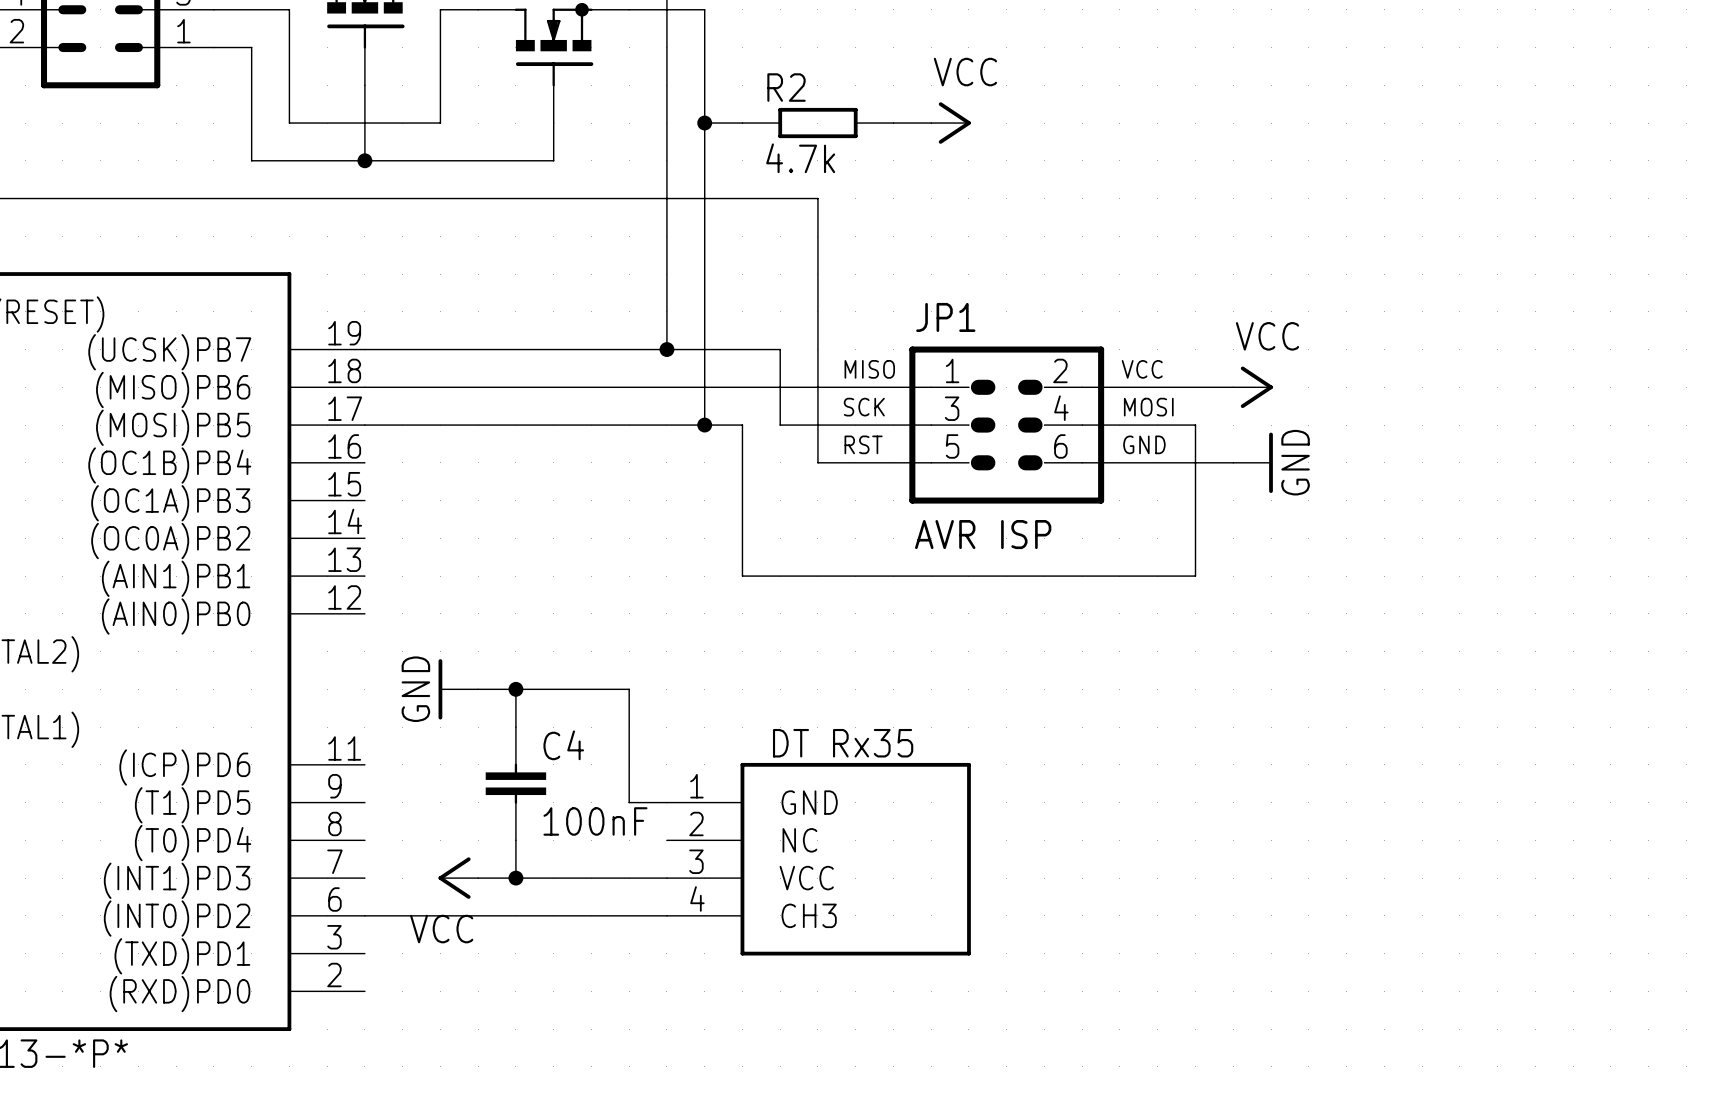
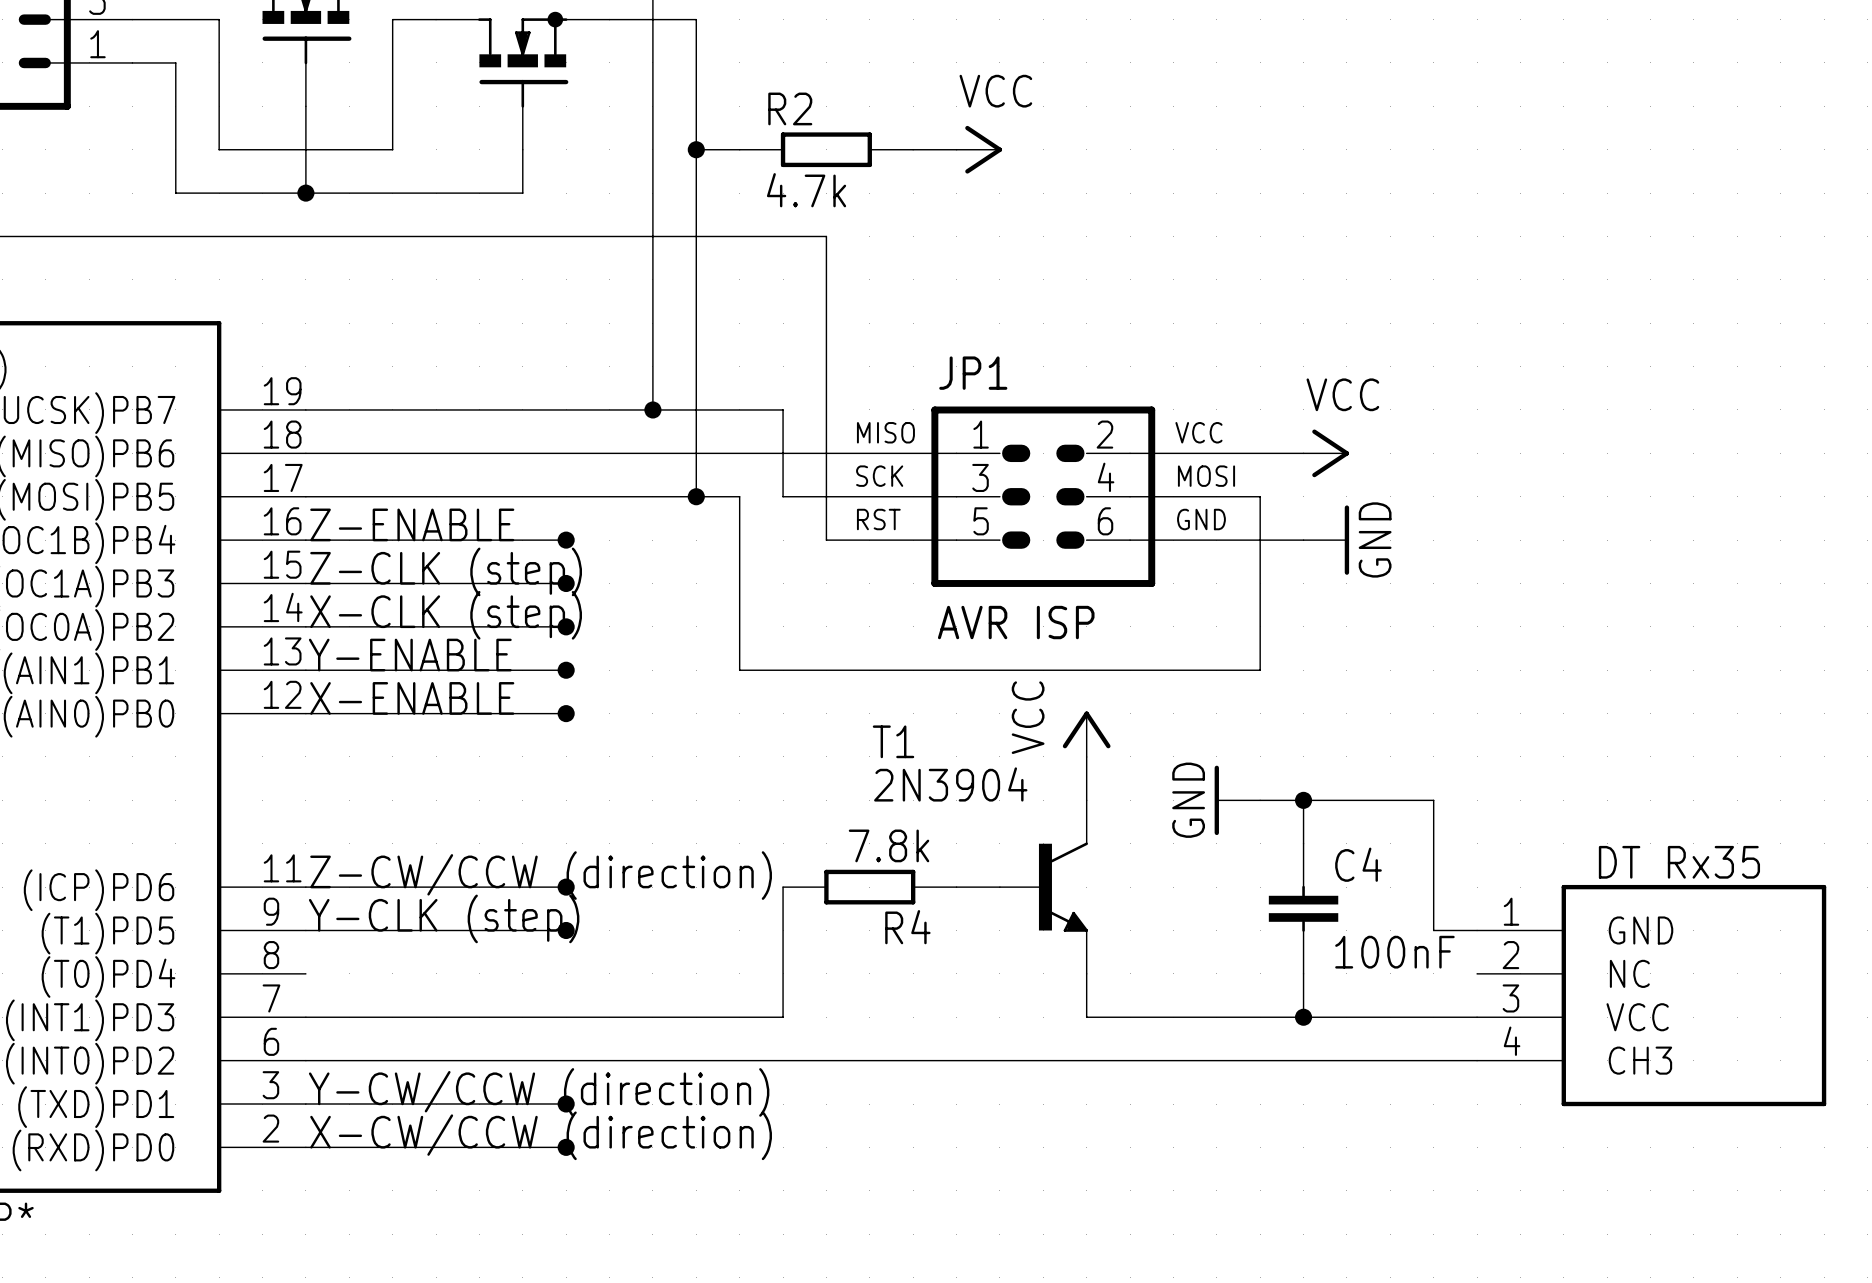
text: none -> Z-ENABLE (412, 524)
wire: none -> (305, 540) (566, 540)
junction: none -> (566, 540)
text: none -> Z-CLK (step) (446, 571)
wire: none -> (305, 583) (566, 583)
junction: none -> (566, 583)
text: none -> X-CLK (step) (446, 615)
wire: none -> (305, 626) (566, 626)
junction: none -> (566, 626)
text: none -> Y-ENABLE (410, 655)
wire: none -> (305, 670) (566, 670)
junction: none -> (566, 670)
text: none -> X-ENABLE (412, 698)
wire: none -> (305, 713) (566, 713)
junction: none -> (566, 713)
power symbol: none -> VCC (1086, 734)
wire: none -> (1086, 756) (1086, 800)
power symbol: GND (458, 689) -> none
wire: (478, 689) (629, 689) (629, 802) (666, 802) -> none
wire: (515, 689) (515, 727) -> none
junction: (515, 689) -> none
power symbol: none -> GND (1237, 800)
wire: none -> (1260, 800) (1433, 800) (1433, 930) (1477, 930)
wire: none -> (1303, 800) (1303, 843)
junction: none -> (1303, 800)
text: none -> Z-CW/CCW (direction) (541, 875)
wire: none -> (305, 887) (566, 887)
junction: none -> (566, 887)
wire: none -> (783, 887) (783, 1017) (652, 1017)
R4: none -> 7.8k (869, 887)
T1: none -> 2N3904 (1043, 887)
C4 position: (515, 783) -> (1303, 908)
text: none -> Y-CLK (step) (444, 918)
wire: none -> (305, 930) (566, 930)
junction: none -> (566, 930)
wire: (515, 840) (515, 878) -> none
wire: none -> (1086, 973) (1086, 1017) (1477, 1017)
wire: none -> (1303, 973) (1303, 1017)
part: (818, 859) -> none
part: none -> (1651, 995)
wire: none -> (305, 1017) (436, 1017)
power symbol: VCC (458, 878) -> none
junction: (515, 878) -> none
junction: none -> (1303, 1017)
wire: none -> (652, 1060) (1477, 1060)
text: none -> Y-CW/CCW (direction) (539, 1092)
wire: none -> (305, 1104) (566, 1104)
junction: none -> (566, 1104)
text: none -> X-CW/CCW (direction) (541, 1135)
wire: none -> (305, 1147) (566, 1147)
junction: none -> (566, 1147)

